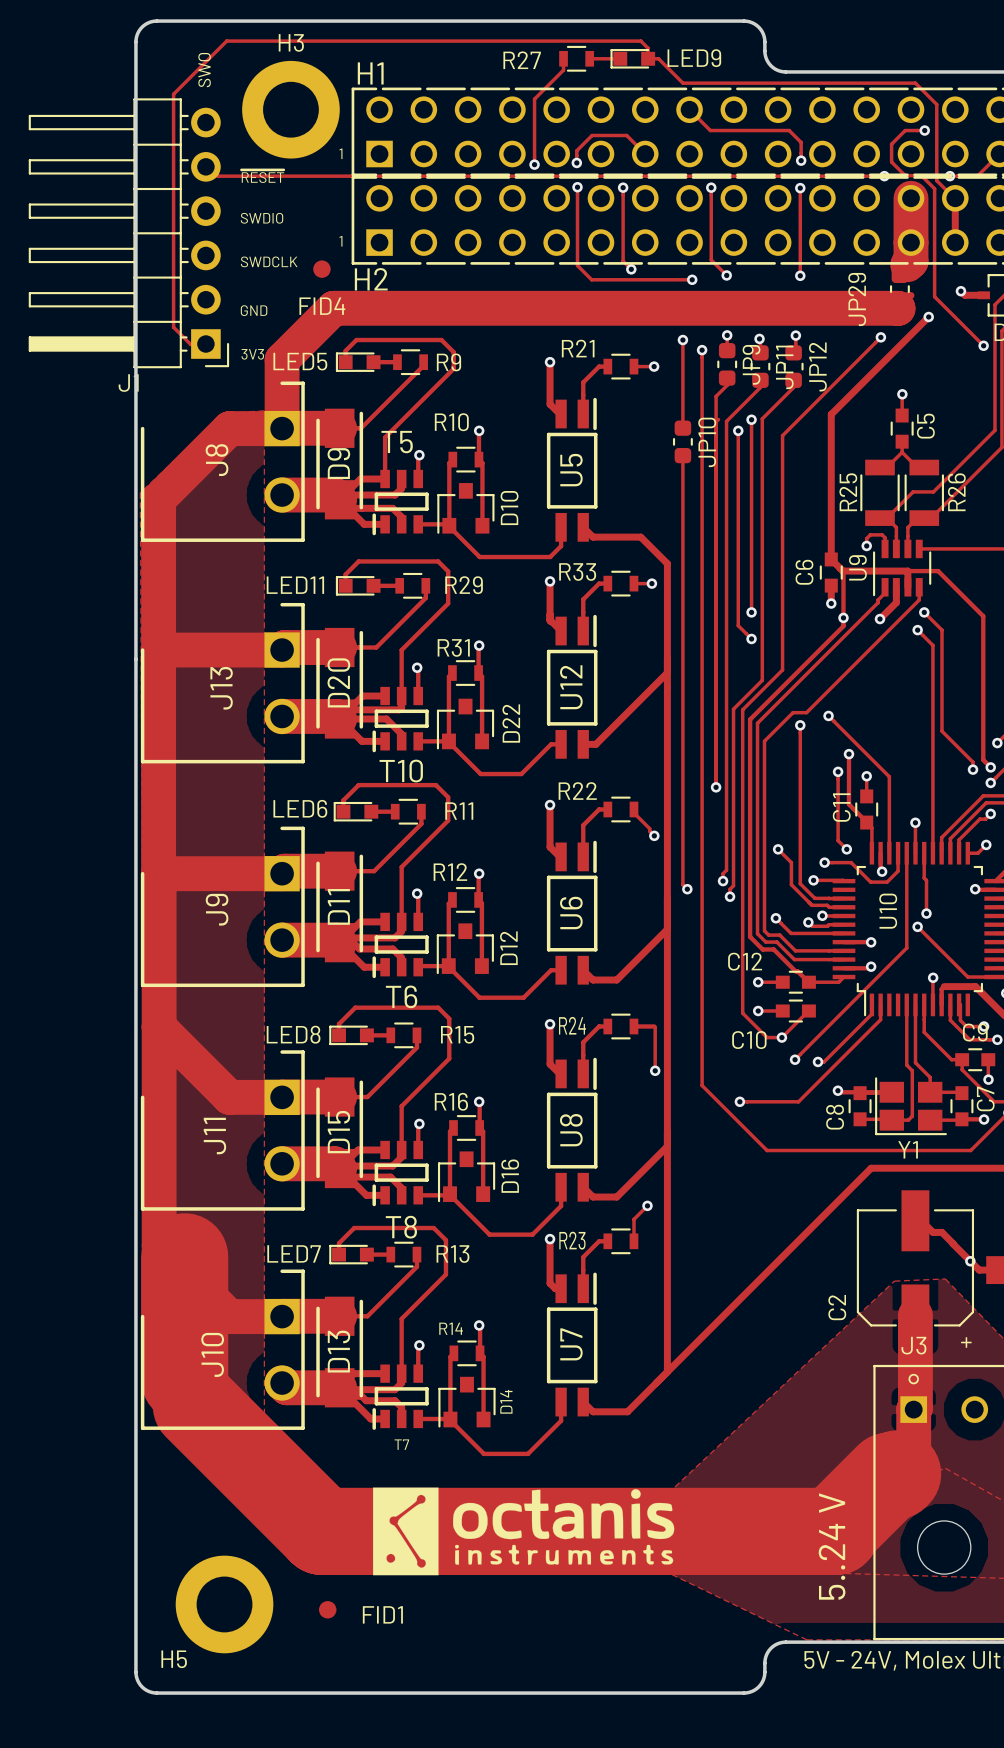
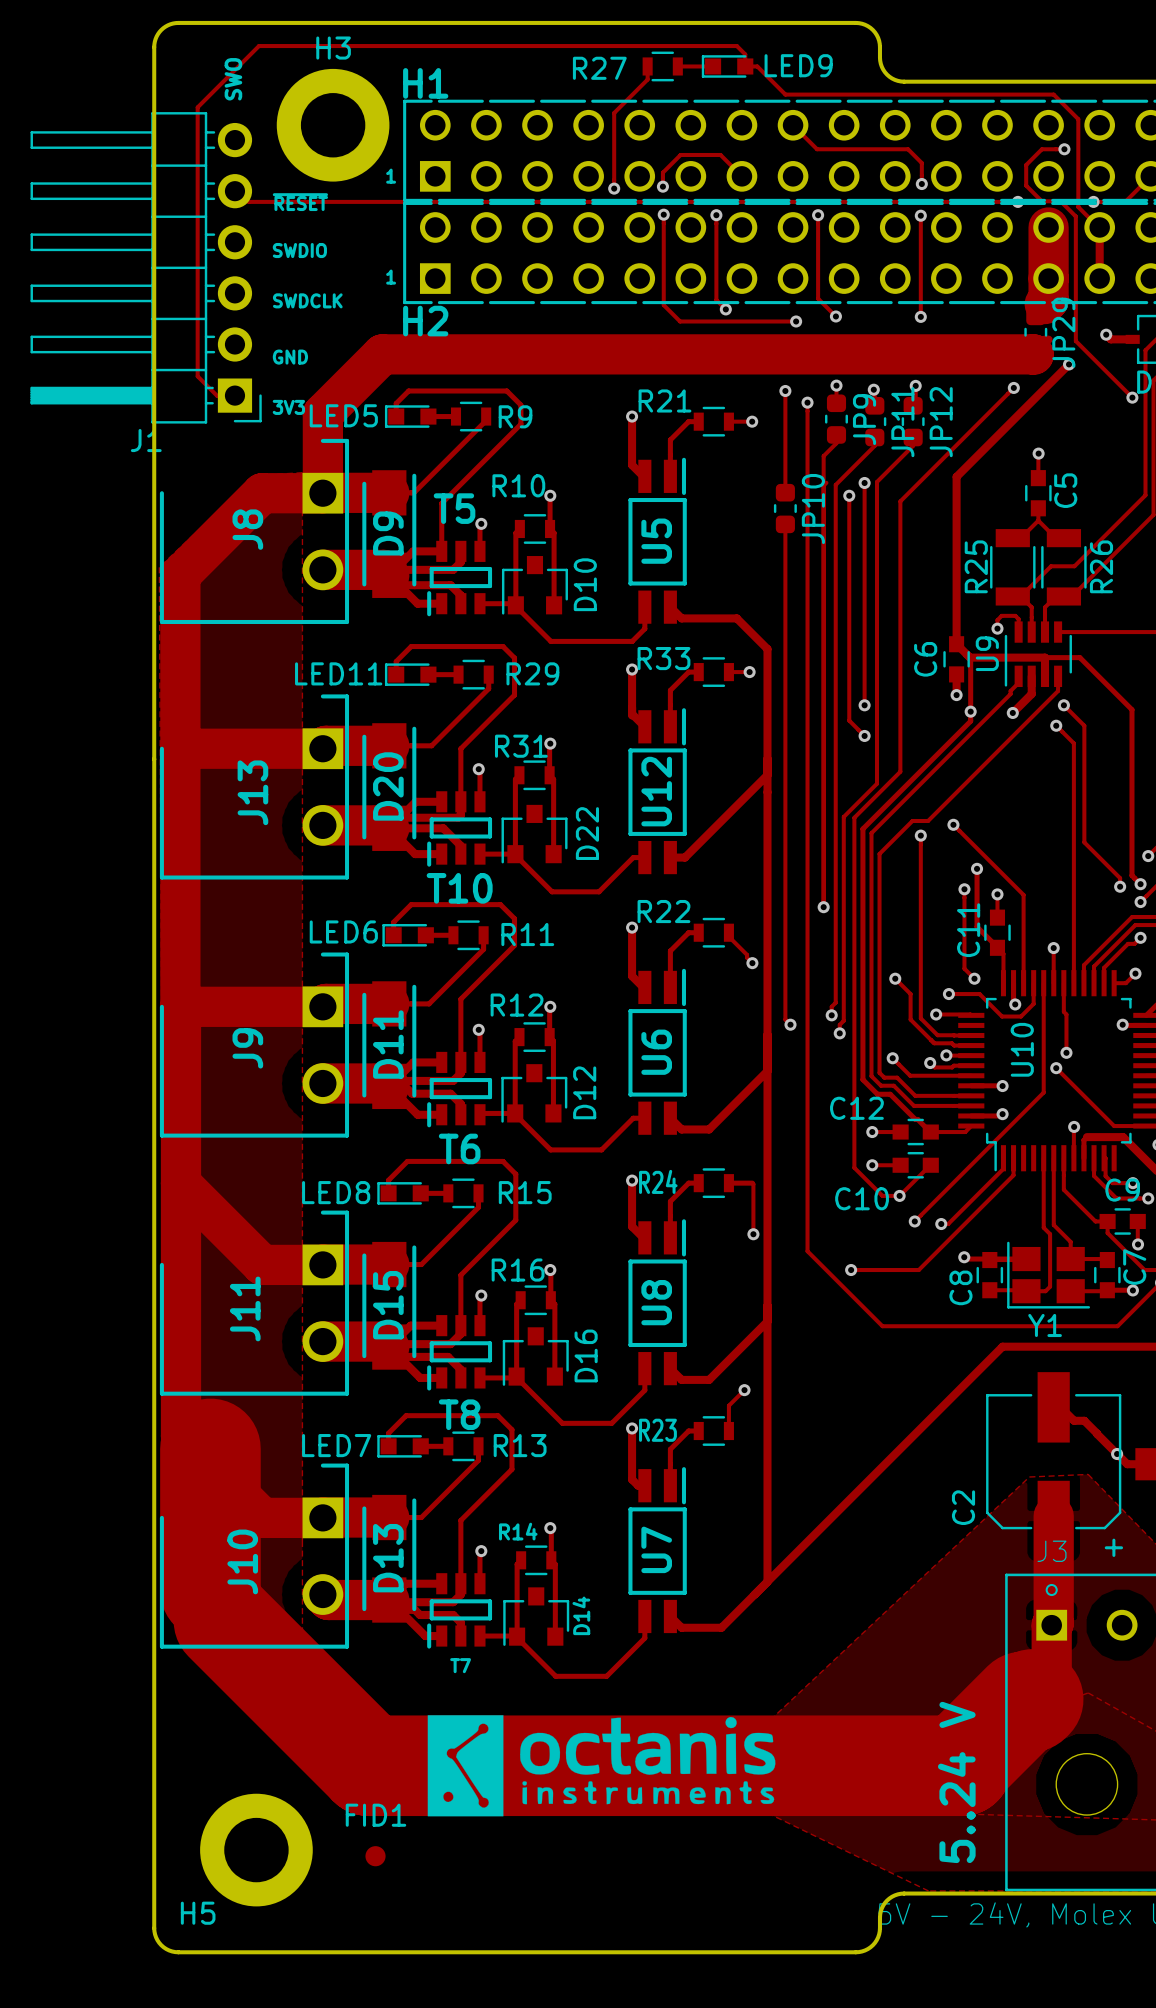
FID4: (321, 269) -> none
JP29 name position: JP29 (857, 299) -> JP29 (1063, 332)
FID1 name position: FID1 (382, 1614) -> FID1 (376, 1815)

